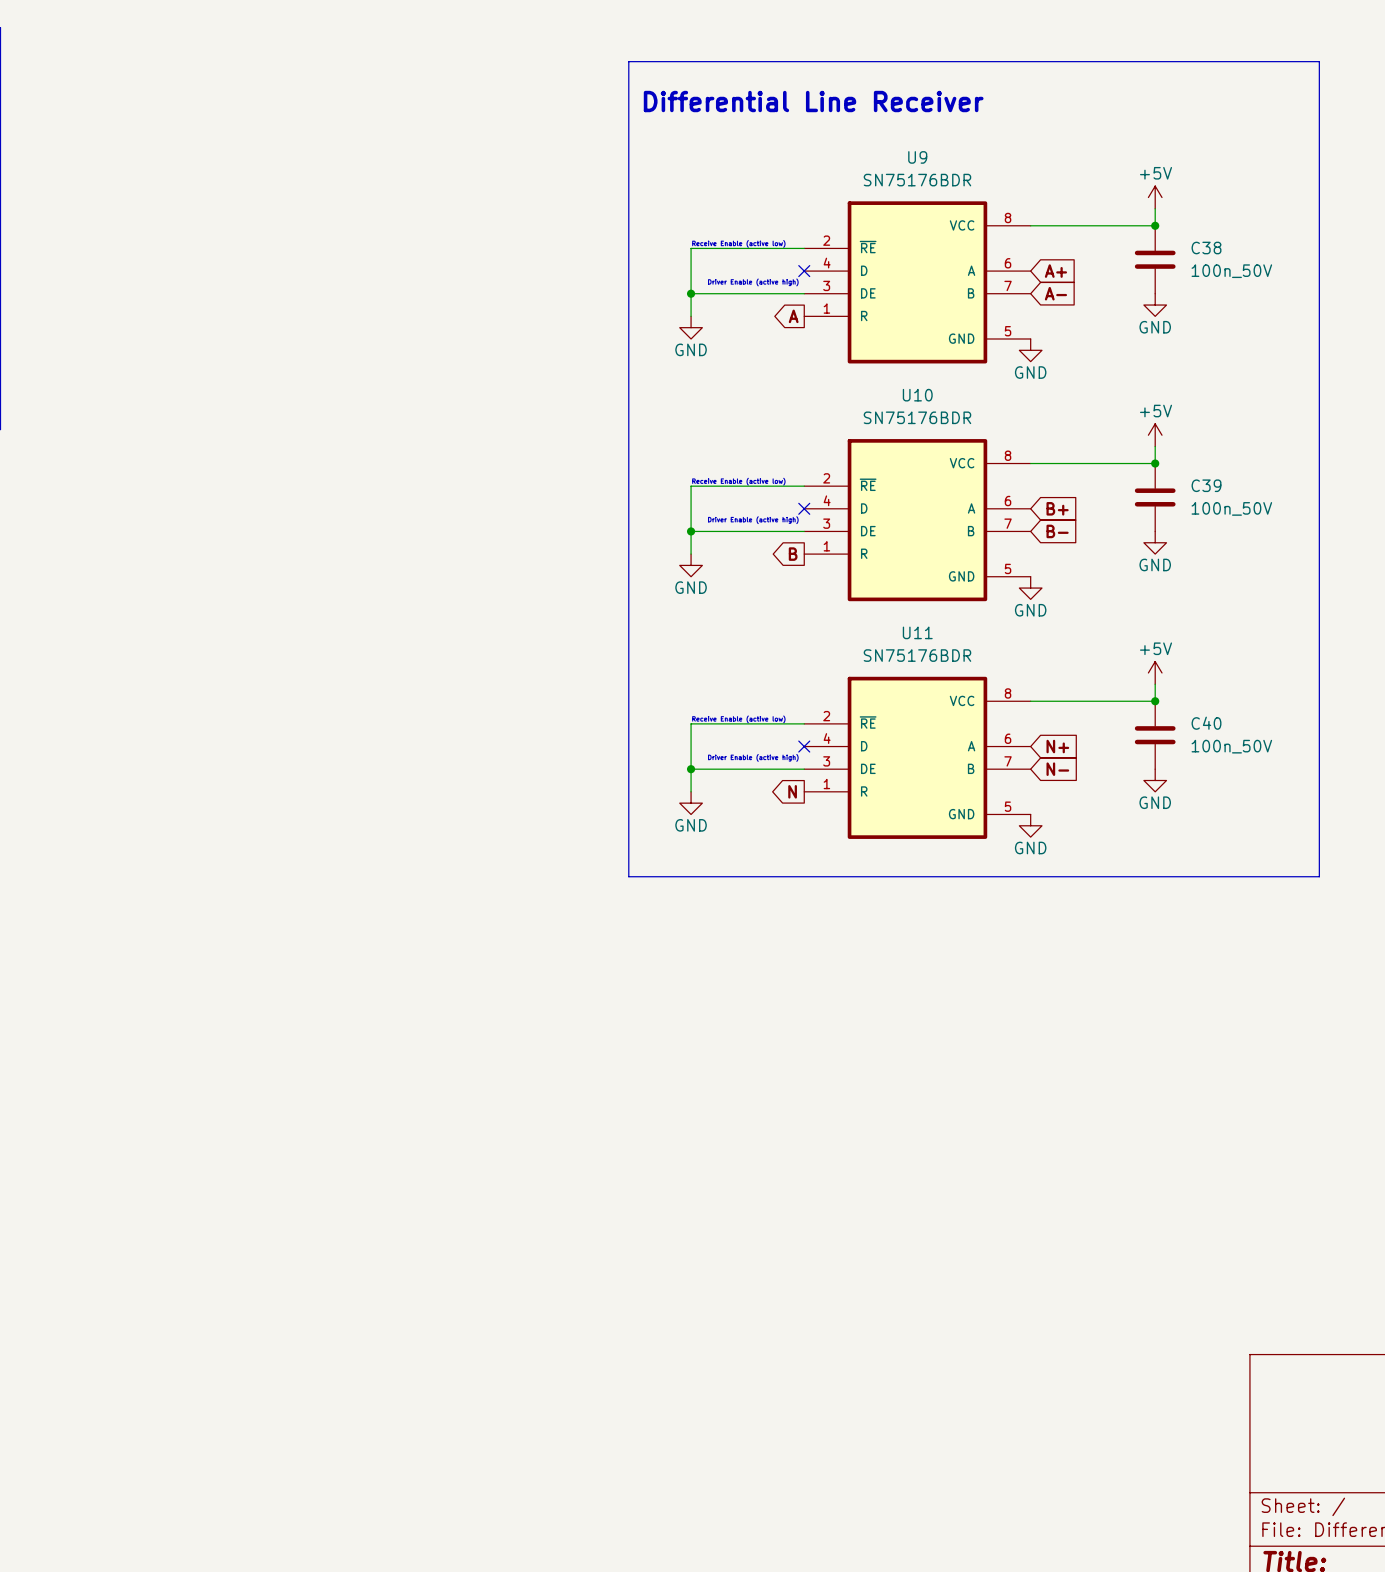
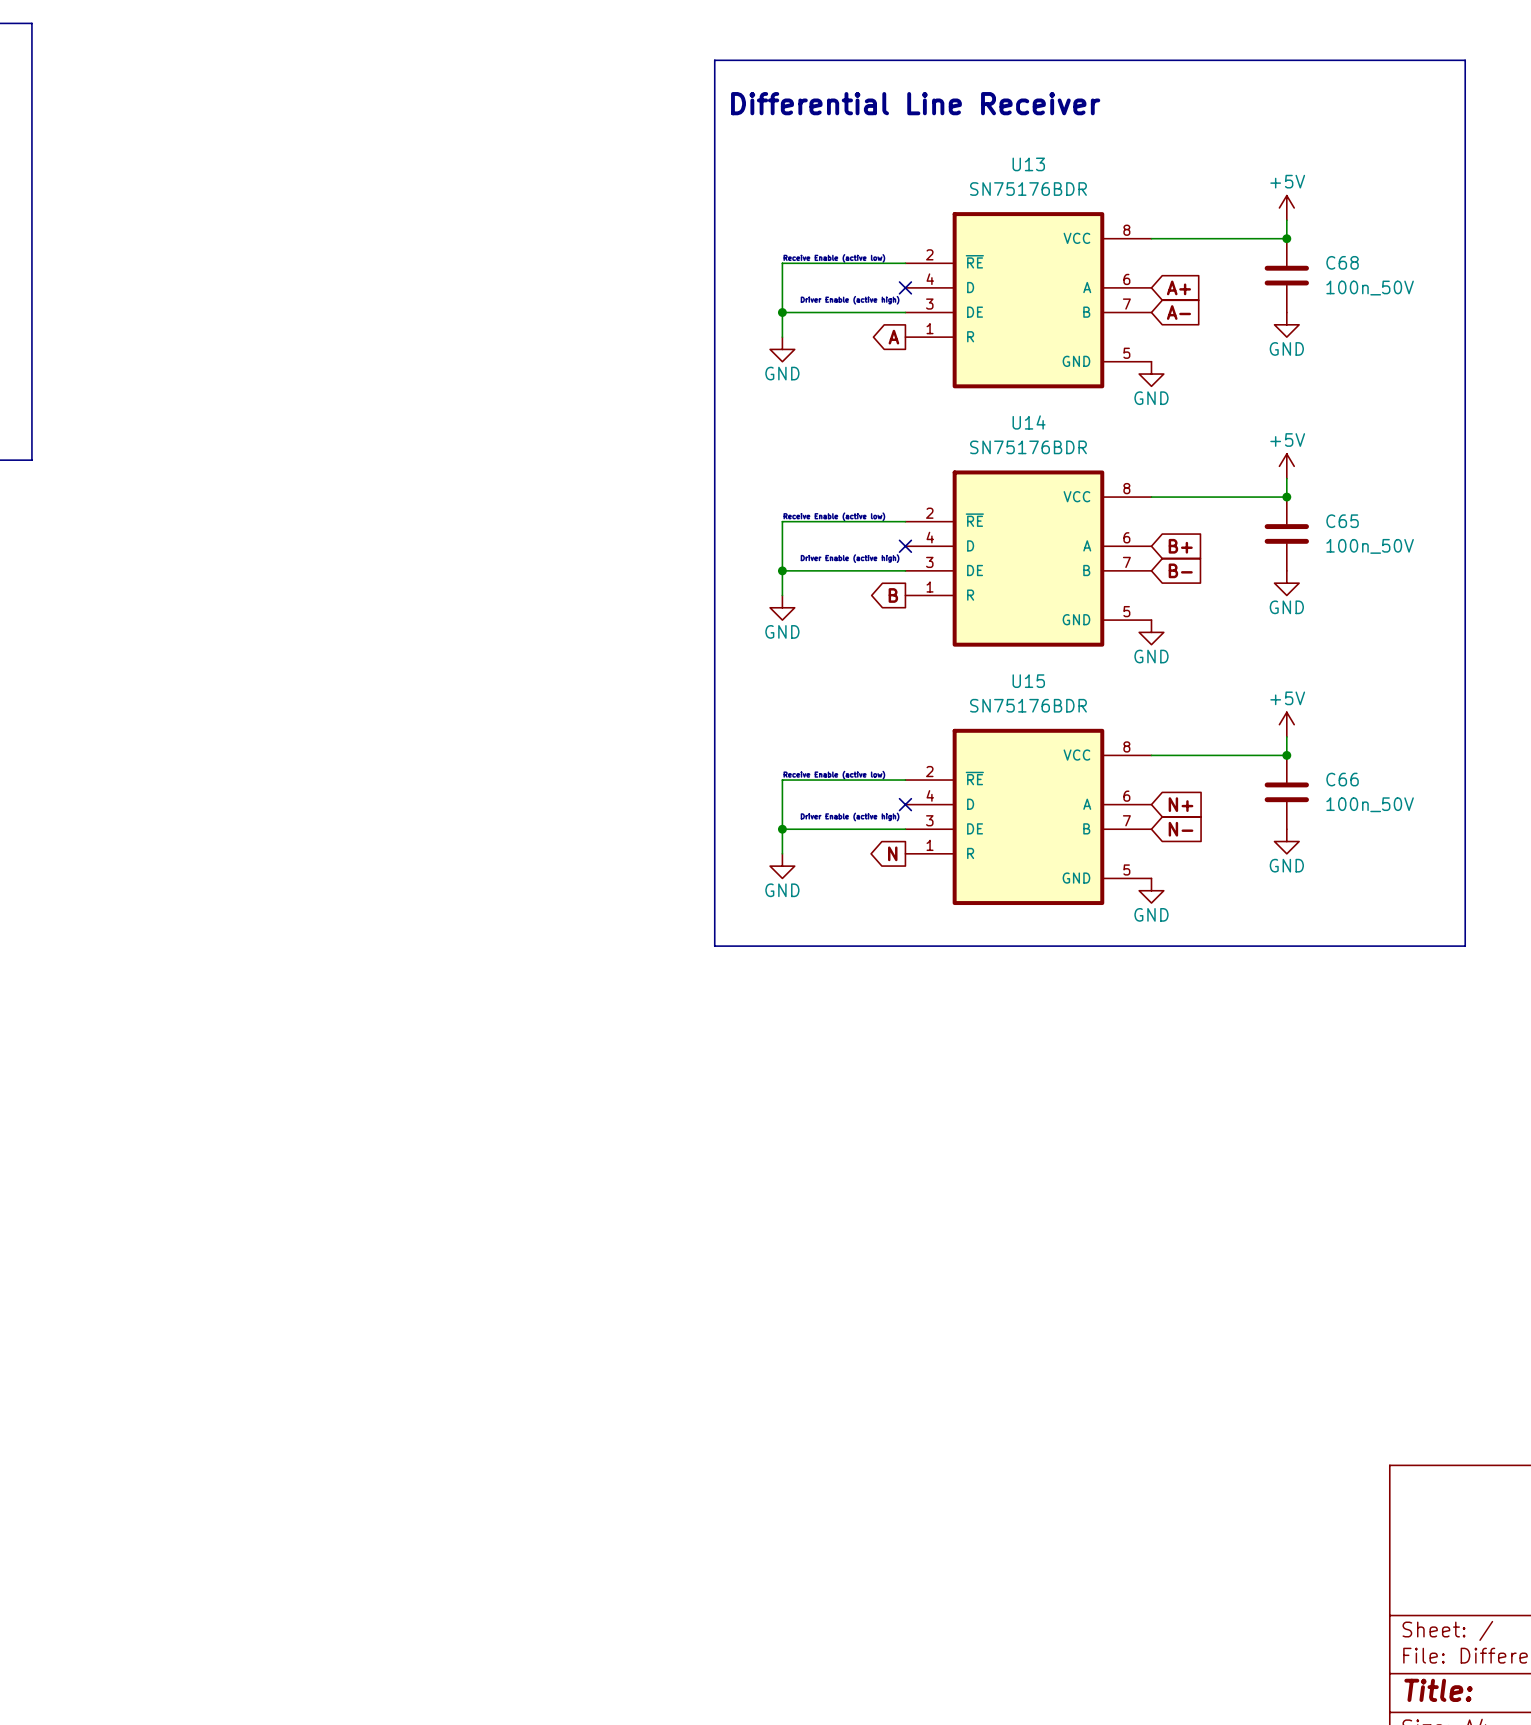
U9 name: U9 (917, 157) -> U13 (1028, 164)
C38 name: C38 (1206, 248) -> C68 (1342, 262)
U10 name: U10 (917, 395) -> U14 (1029, 422)
C39 name: C39 (1206, 485) -> C65 (1342, 521)
U11 name: U11 (917, 632) -> U15 (1028, 681)
C40 name: C40 (1206, 723) -> C66 (1342, 779)

